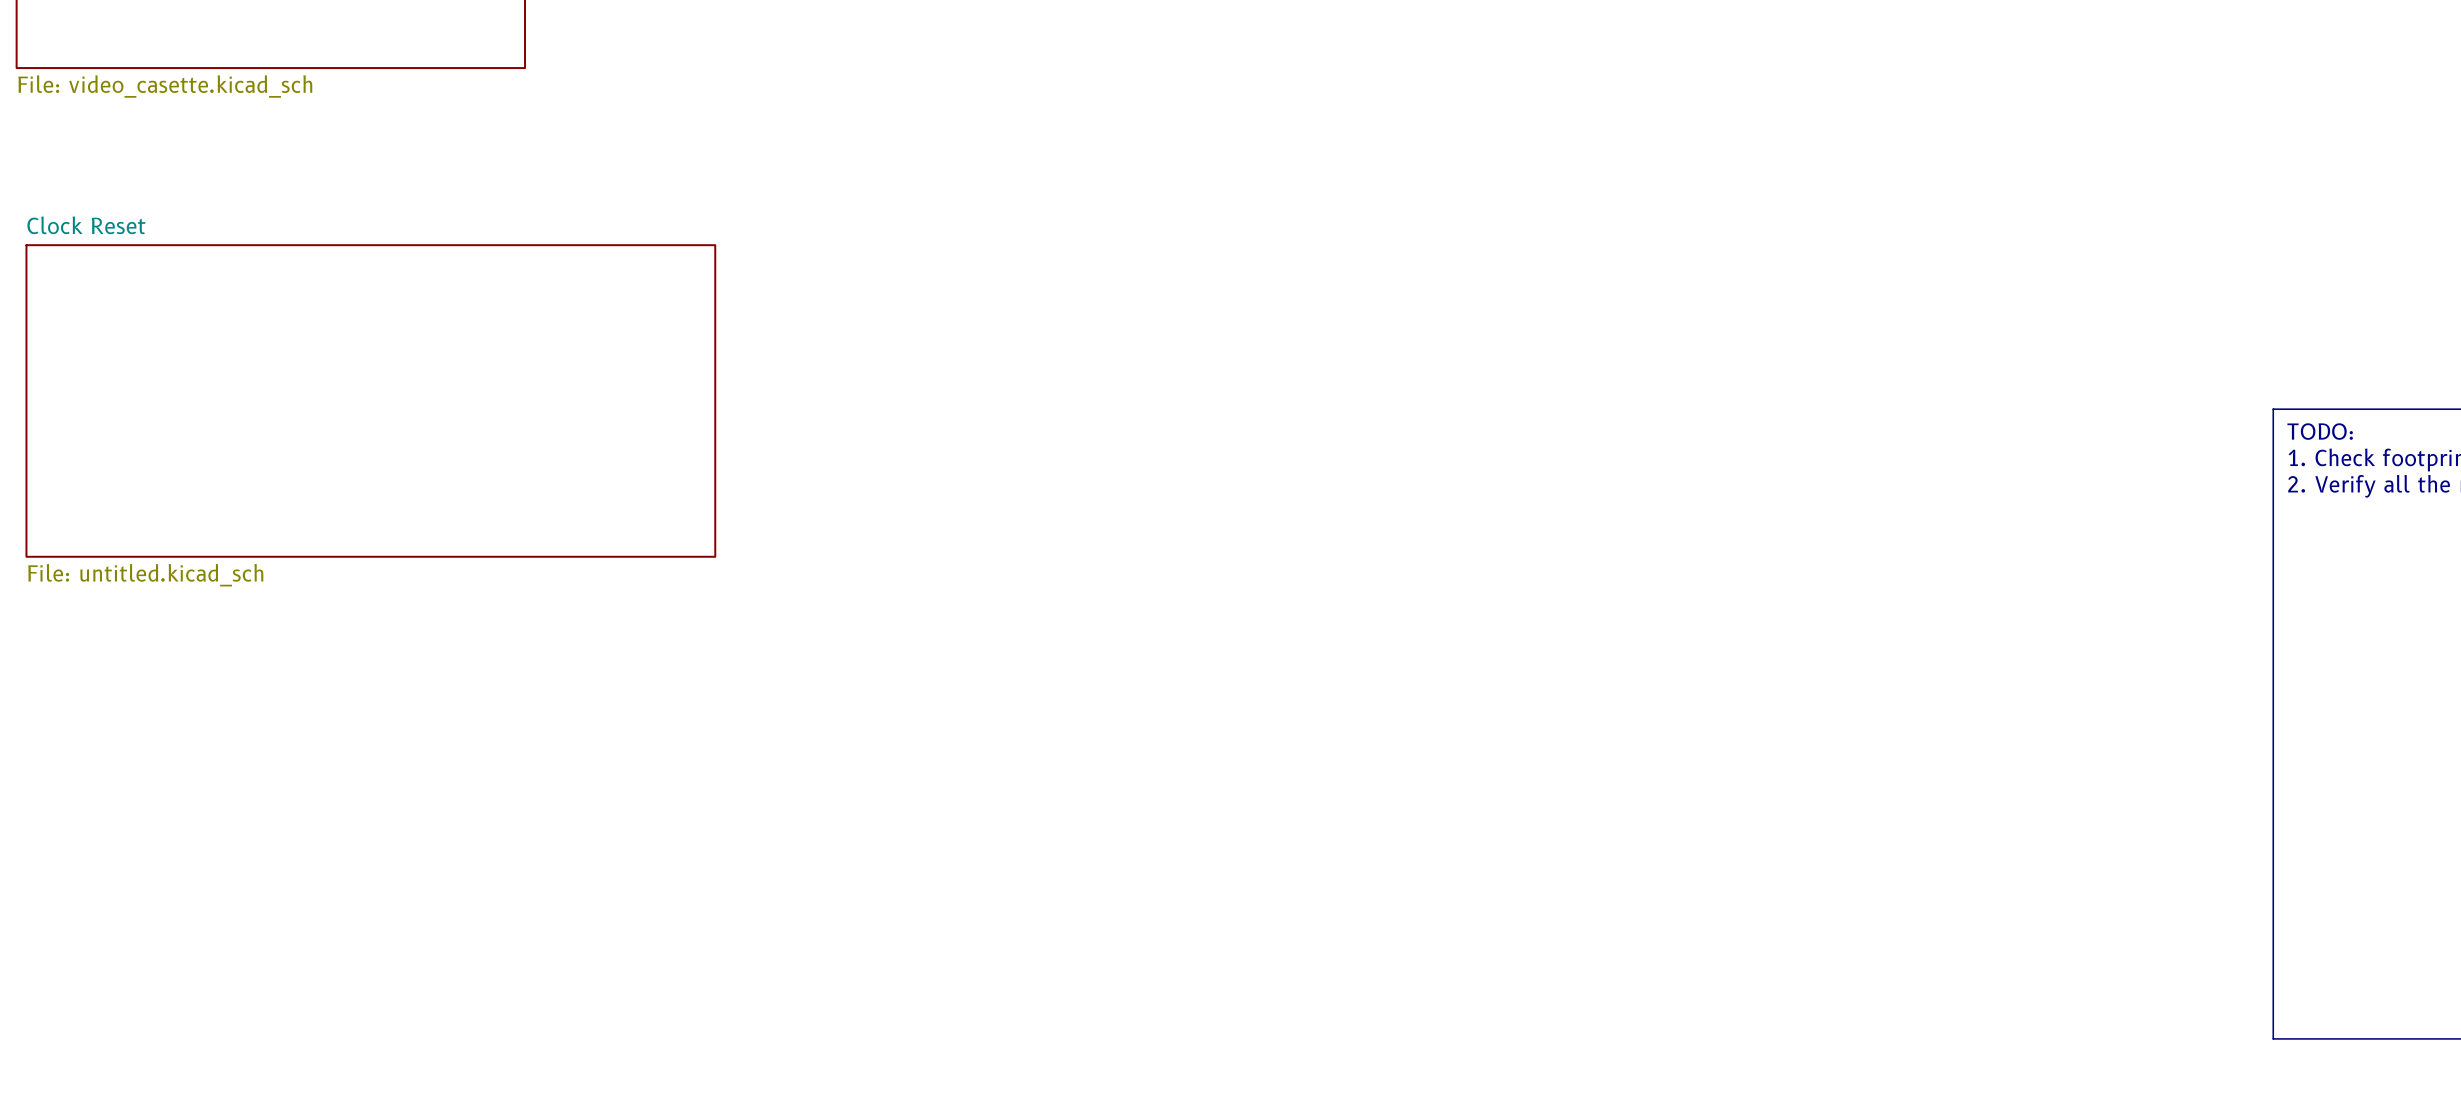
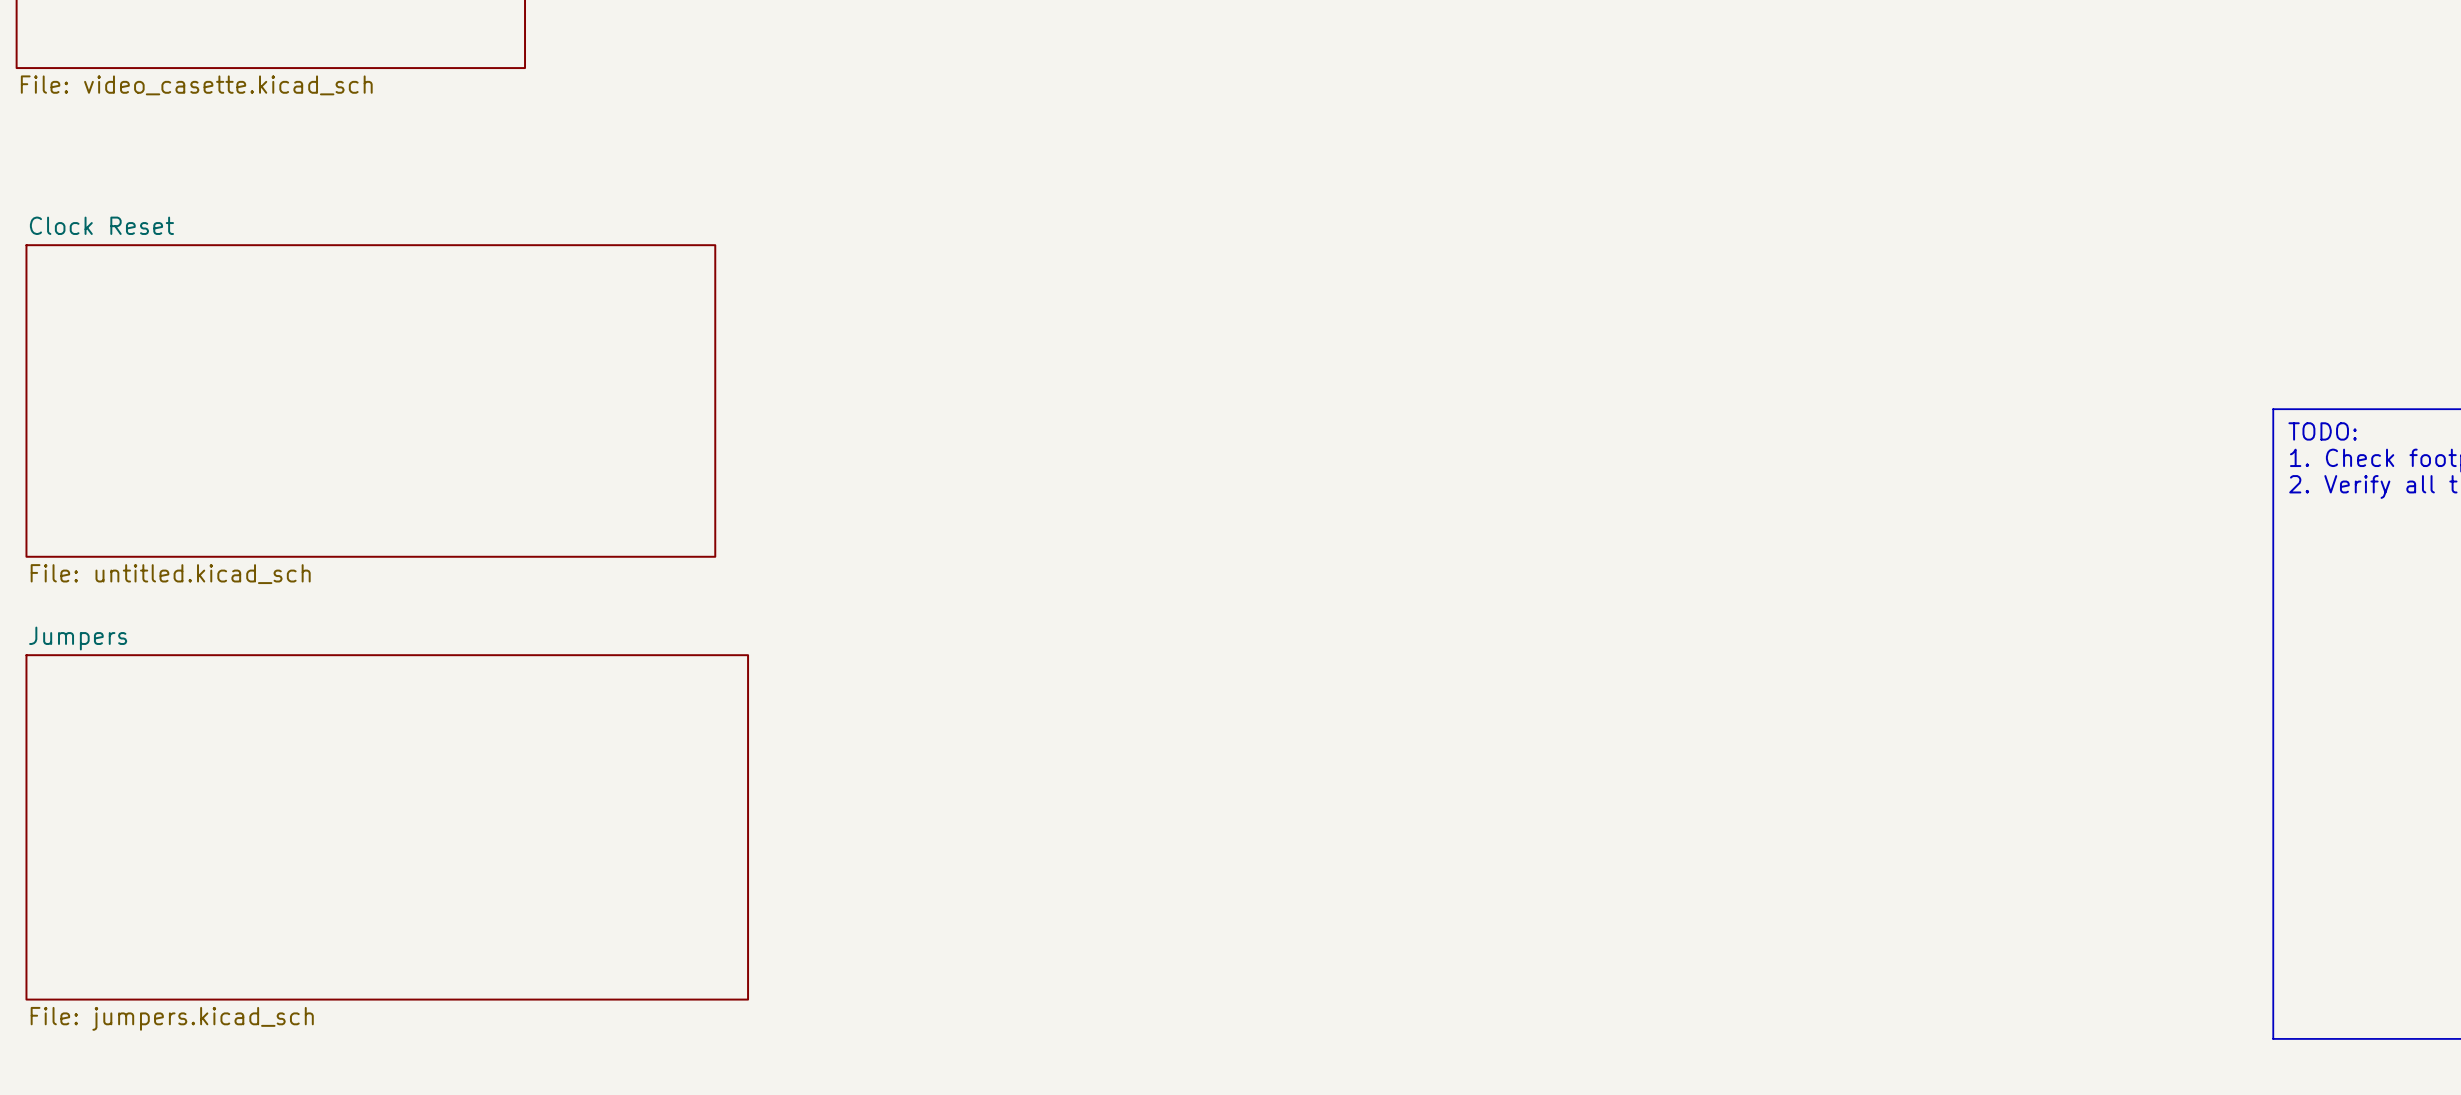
sheet Jumpers: none -> File: jumpers.kicad_sch (387, 827)

